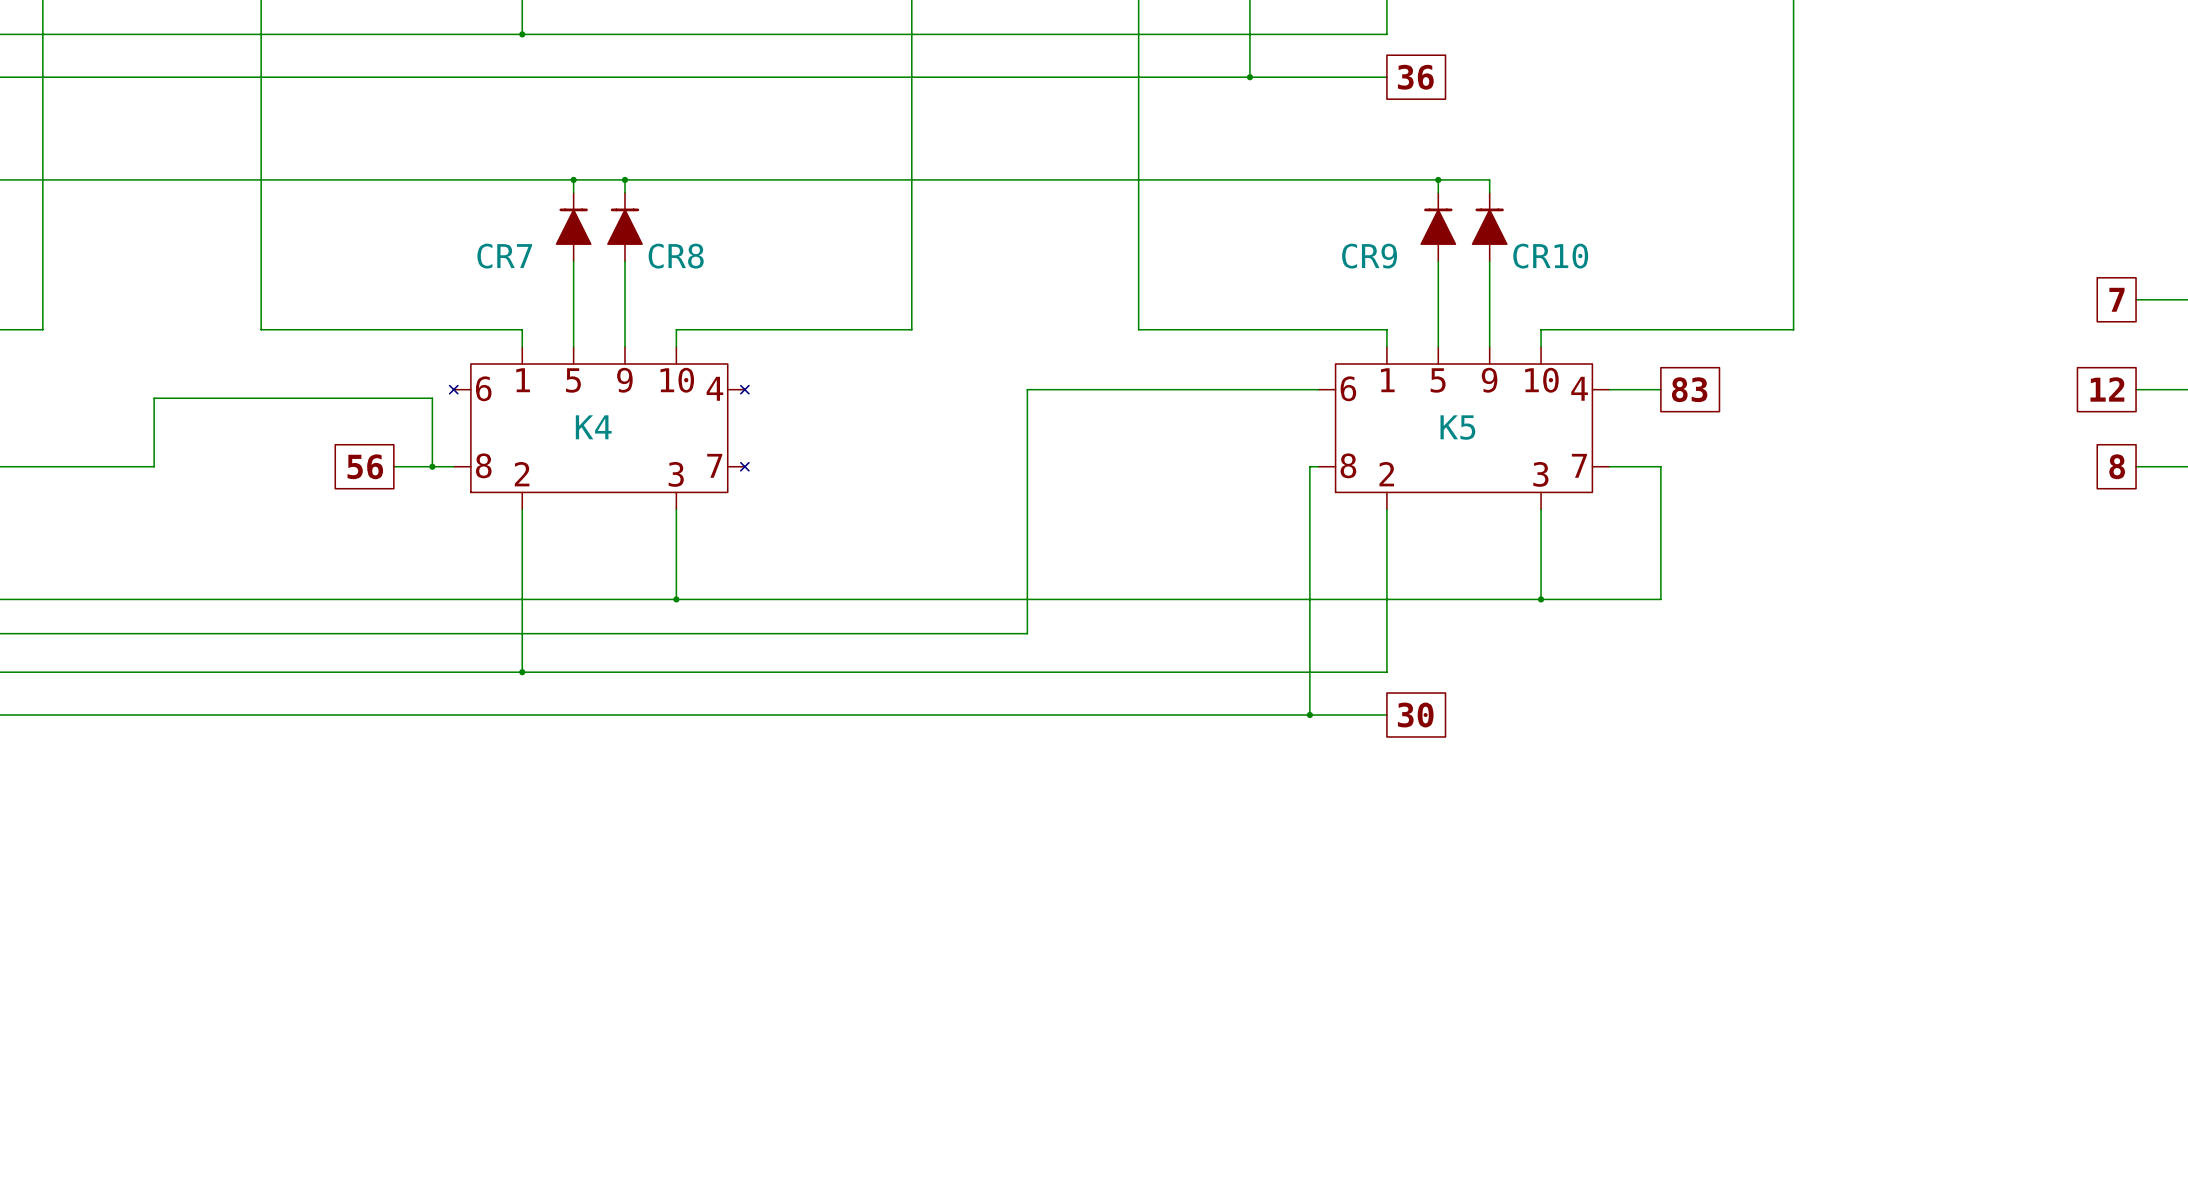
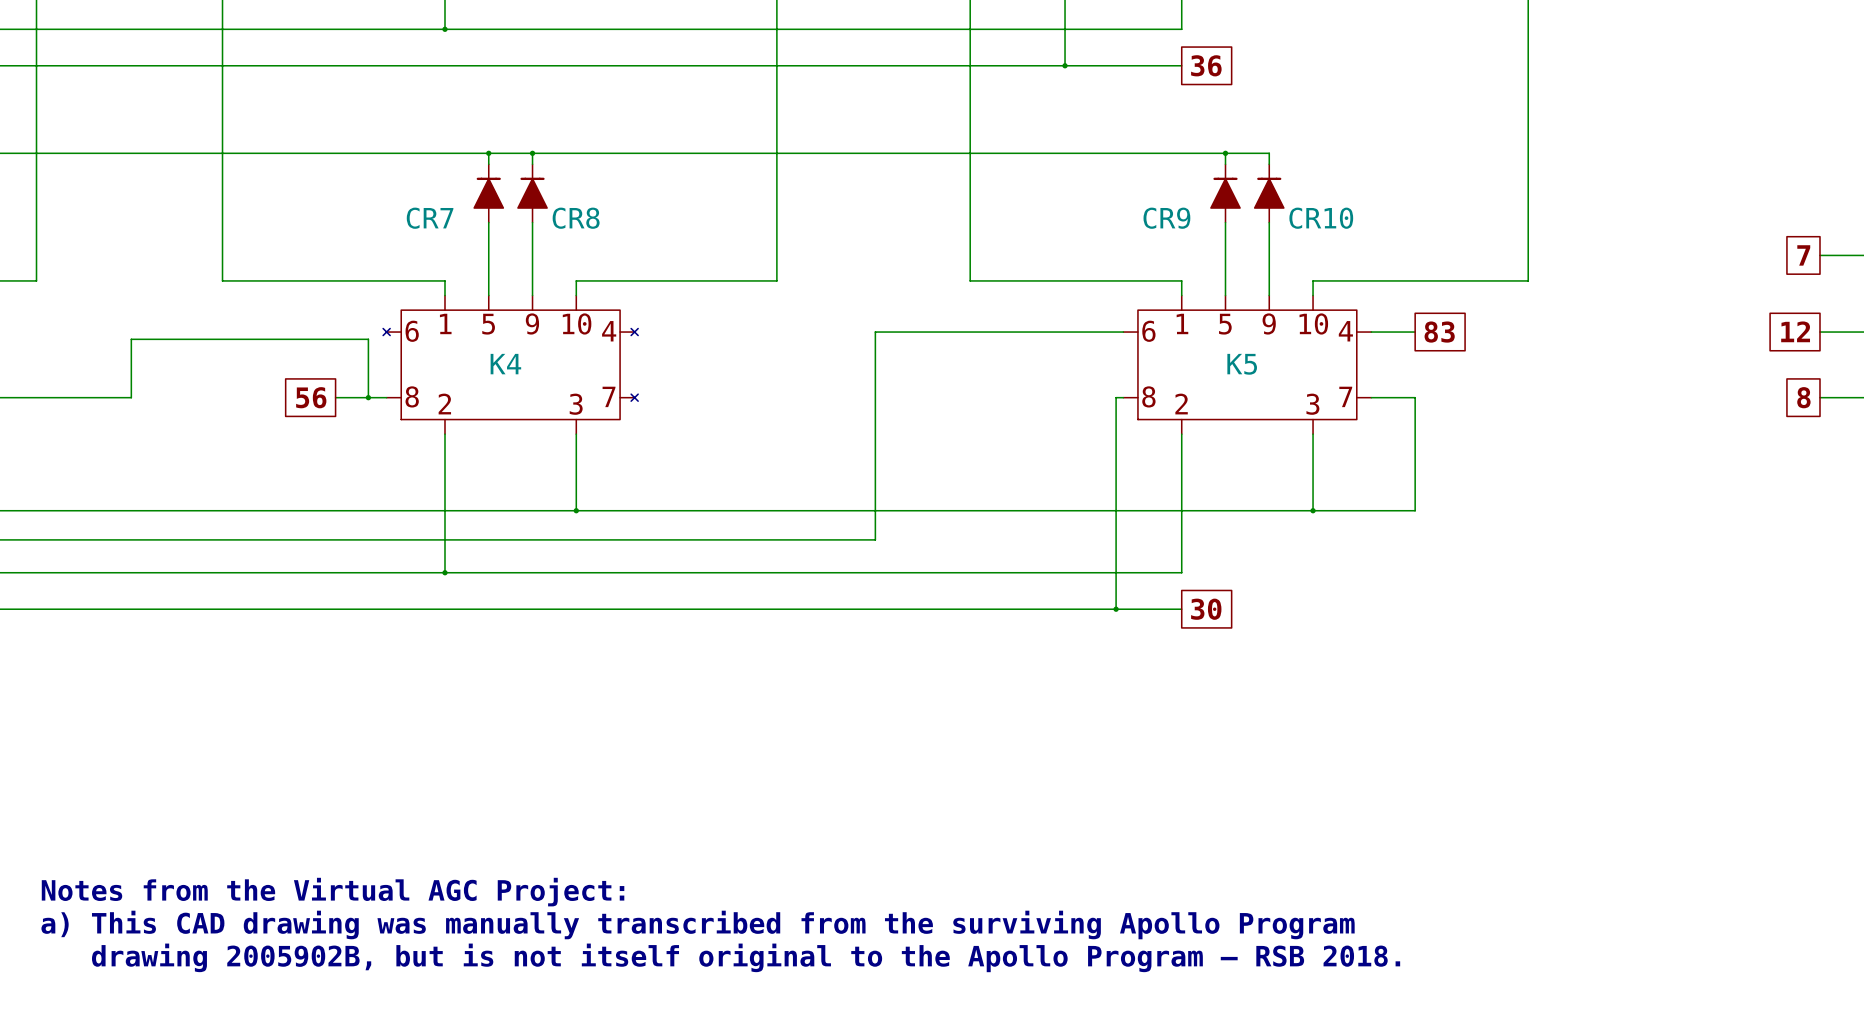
text: none -> Notes from the Virtual AGC Project: (333, 892)
text: none -> a) This CAD drawing was manually transcribed from the surviving Apollo Program (698, 924)
text: none -> drawing 2005902B, but is not itself original to the Apollo Program — RSB 2018. (746, 957)

